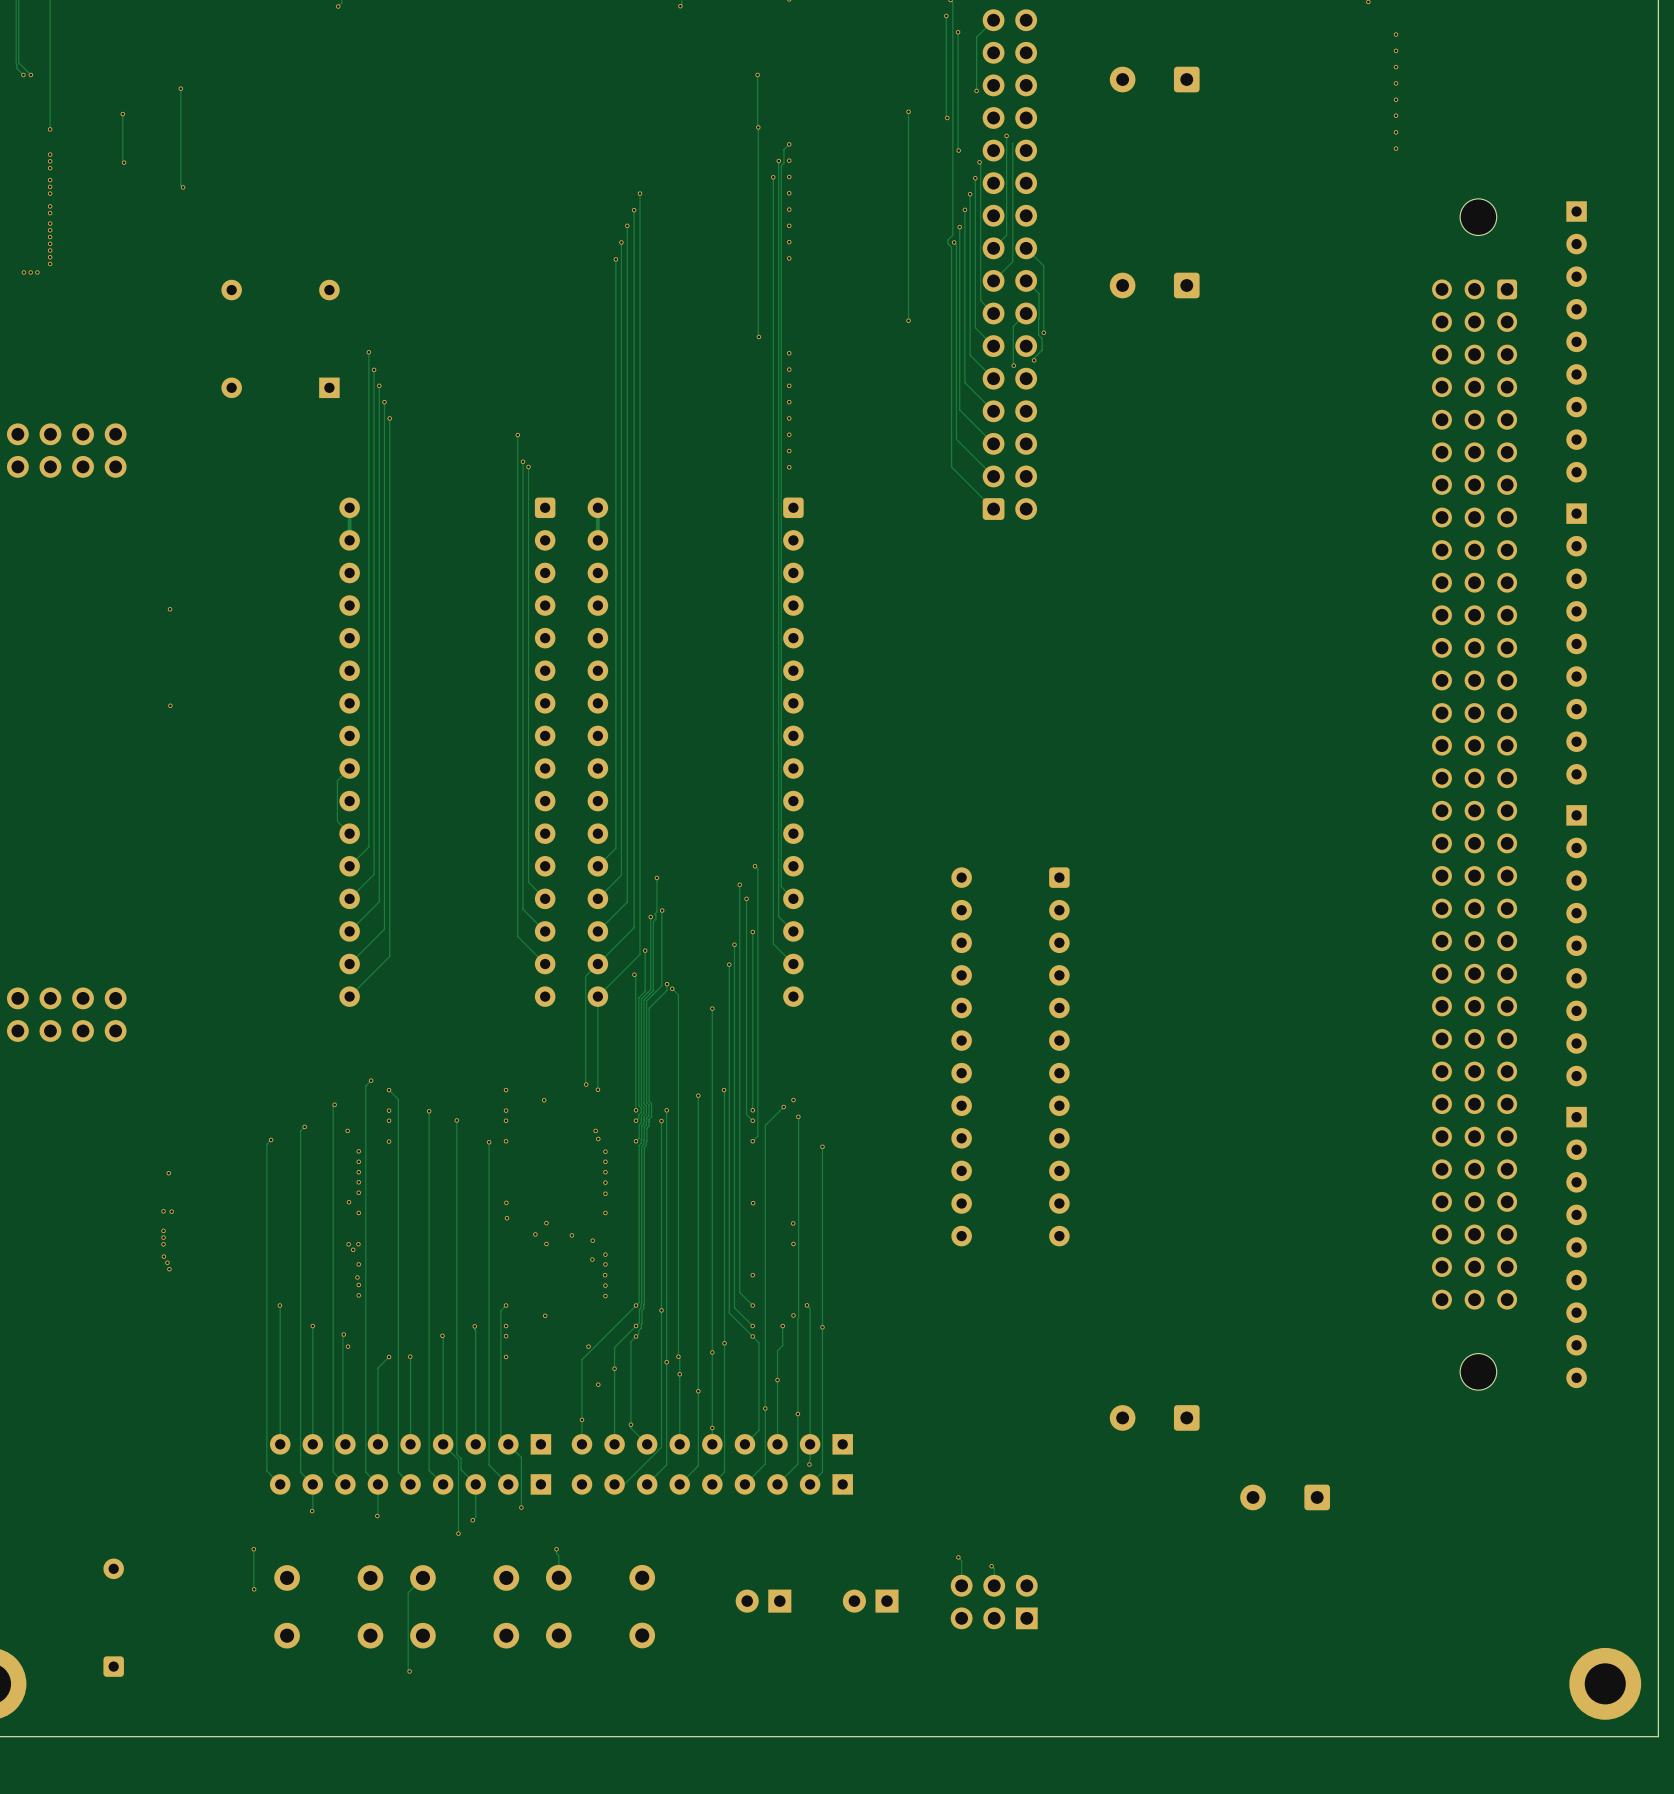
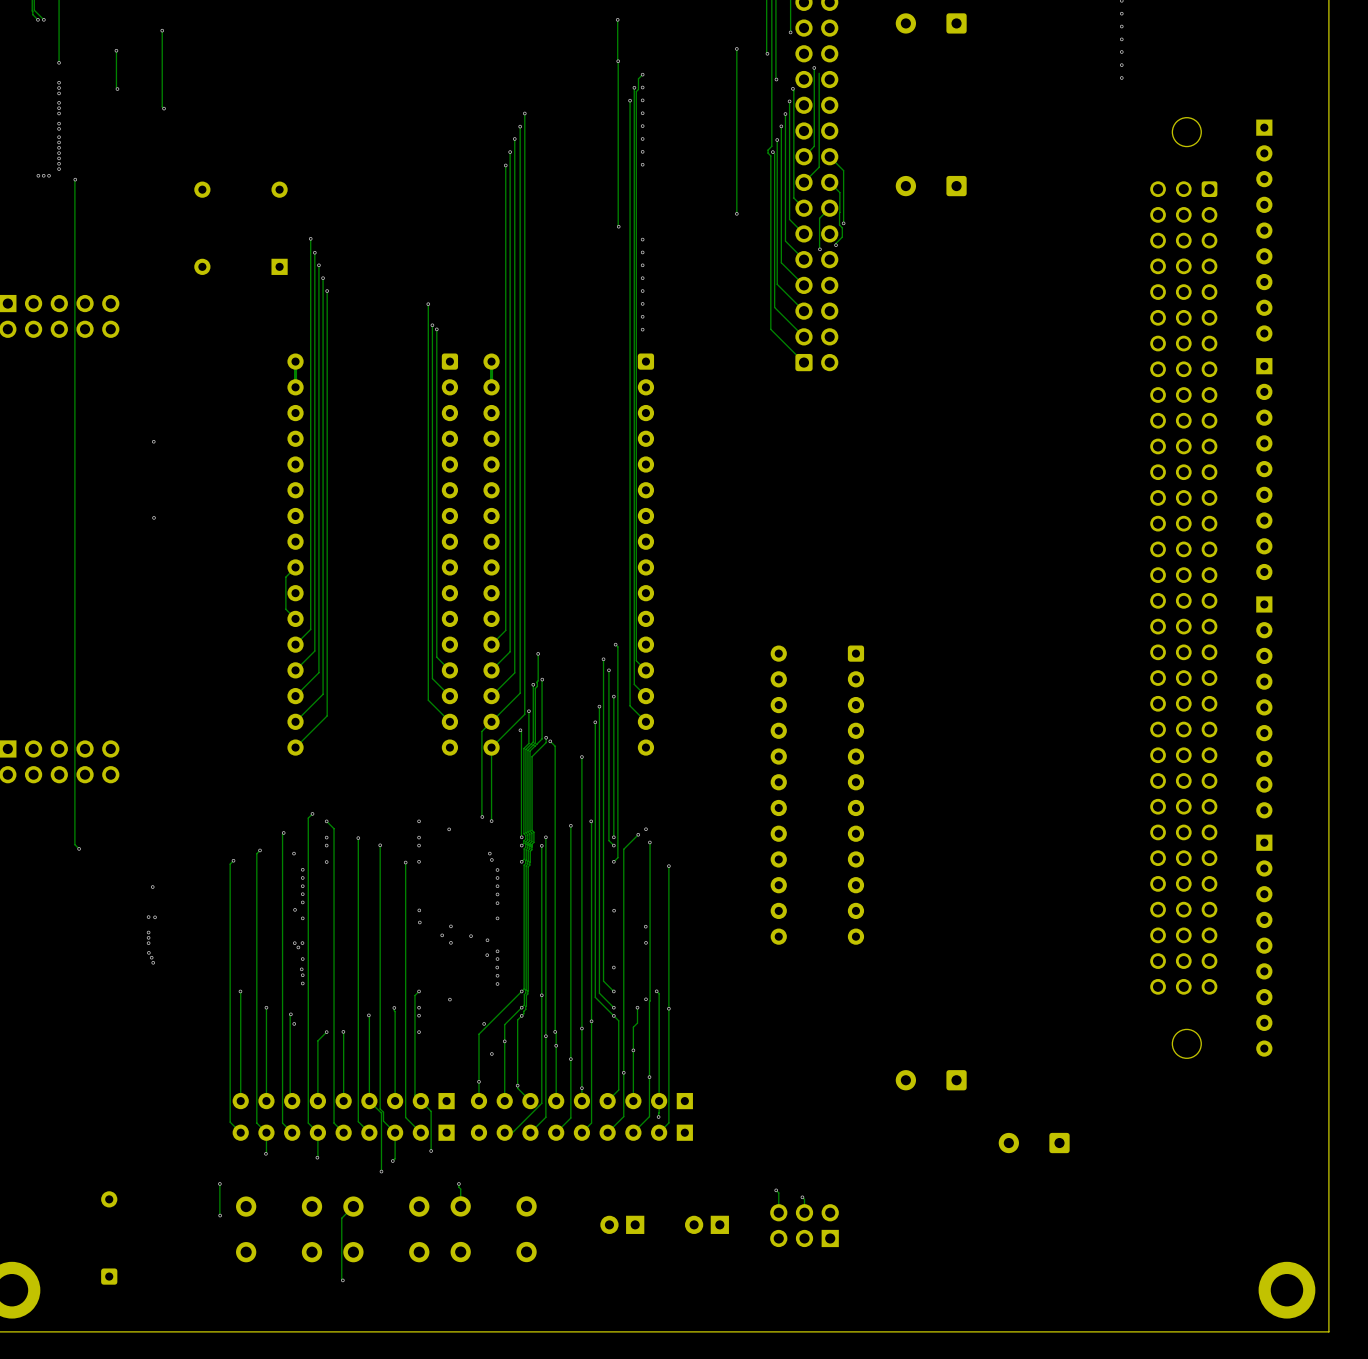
track: none -> (75, 179) (74, 844) (79, 848)
via: none -> (75, 179)
via: none -> (79, 848)

